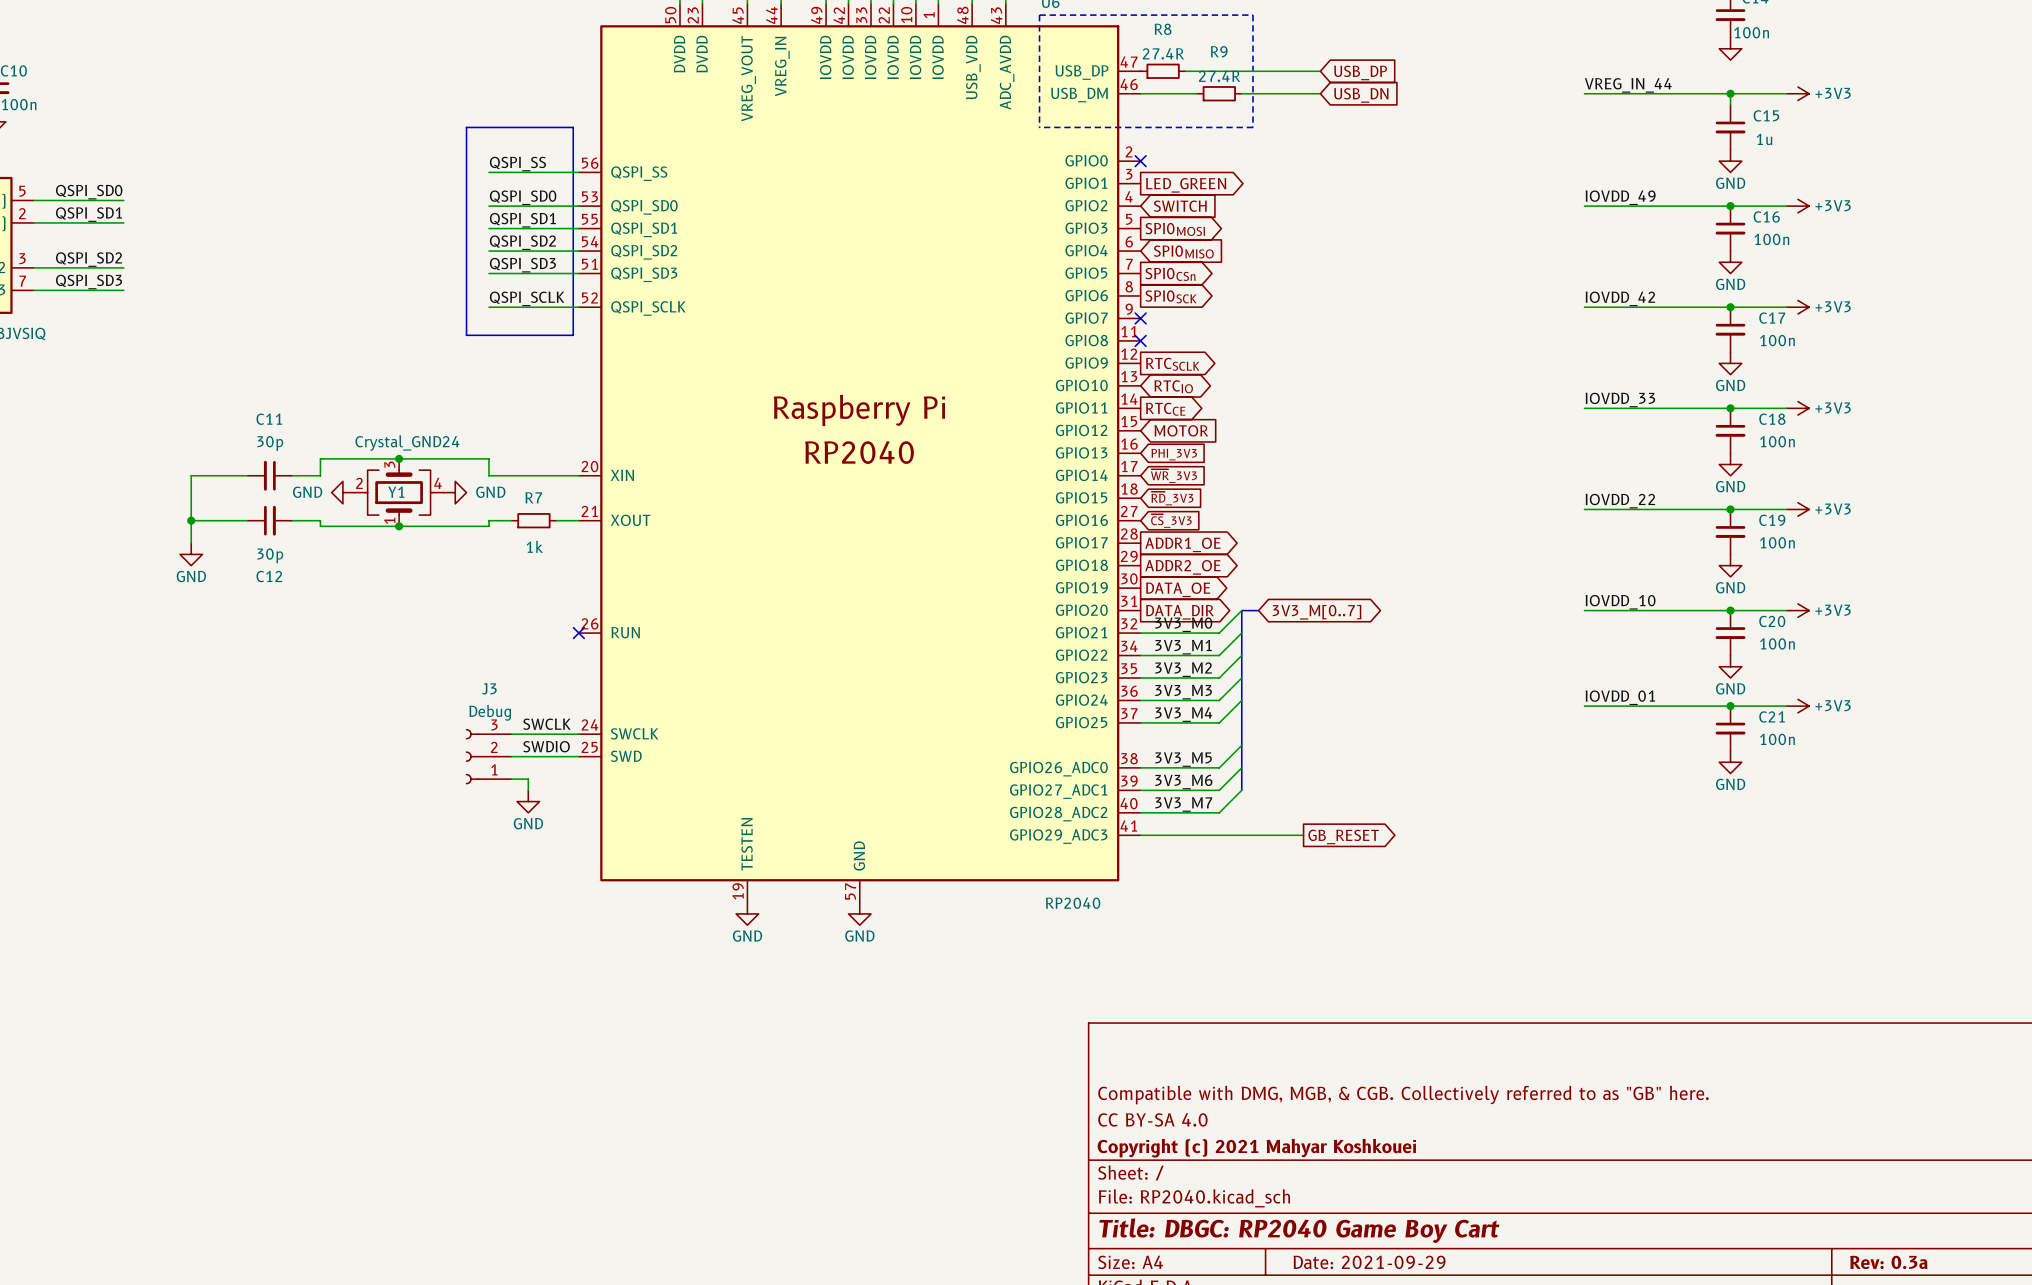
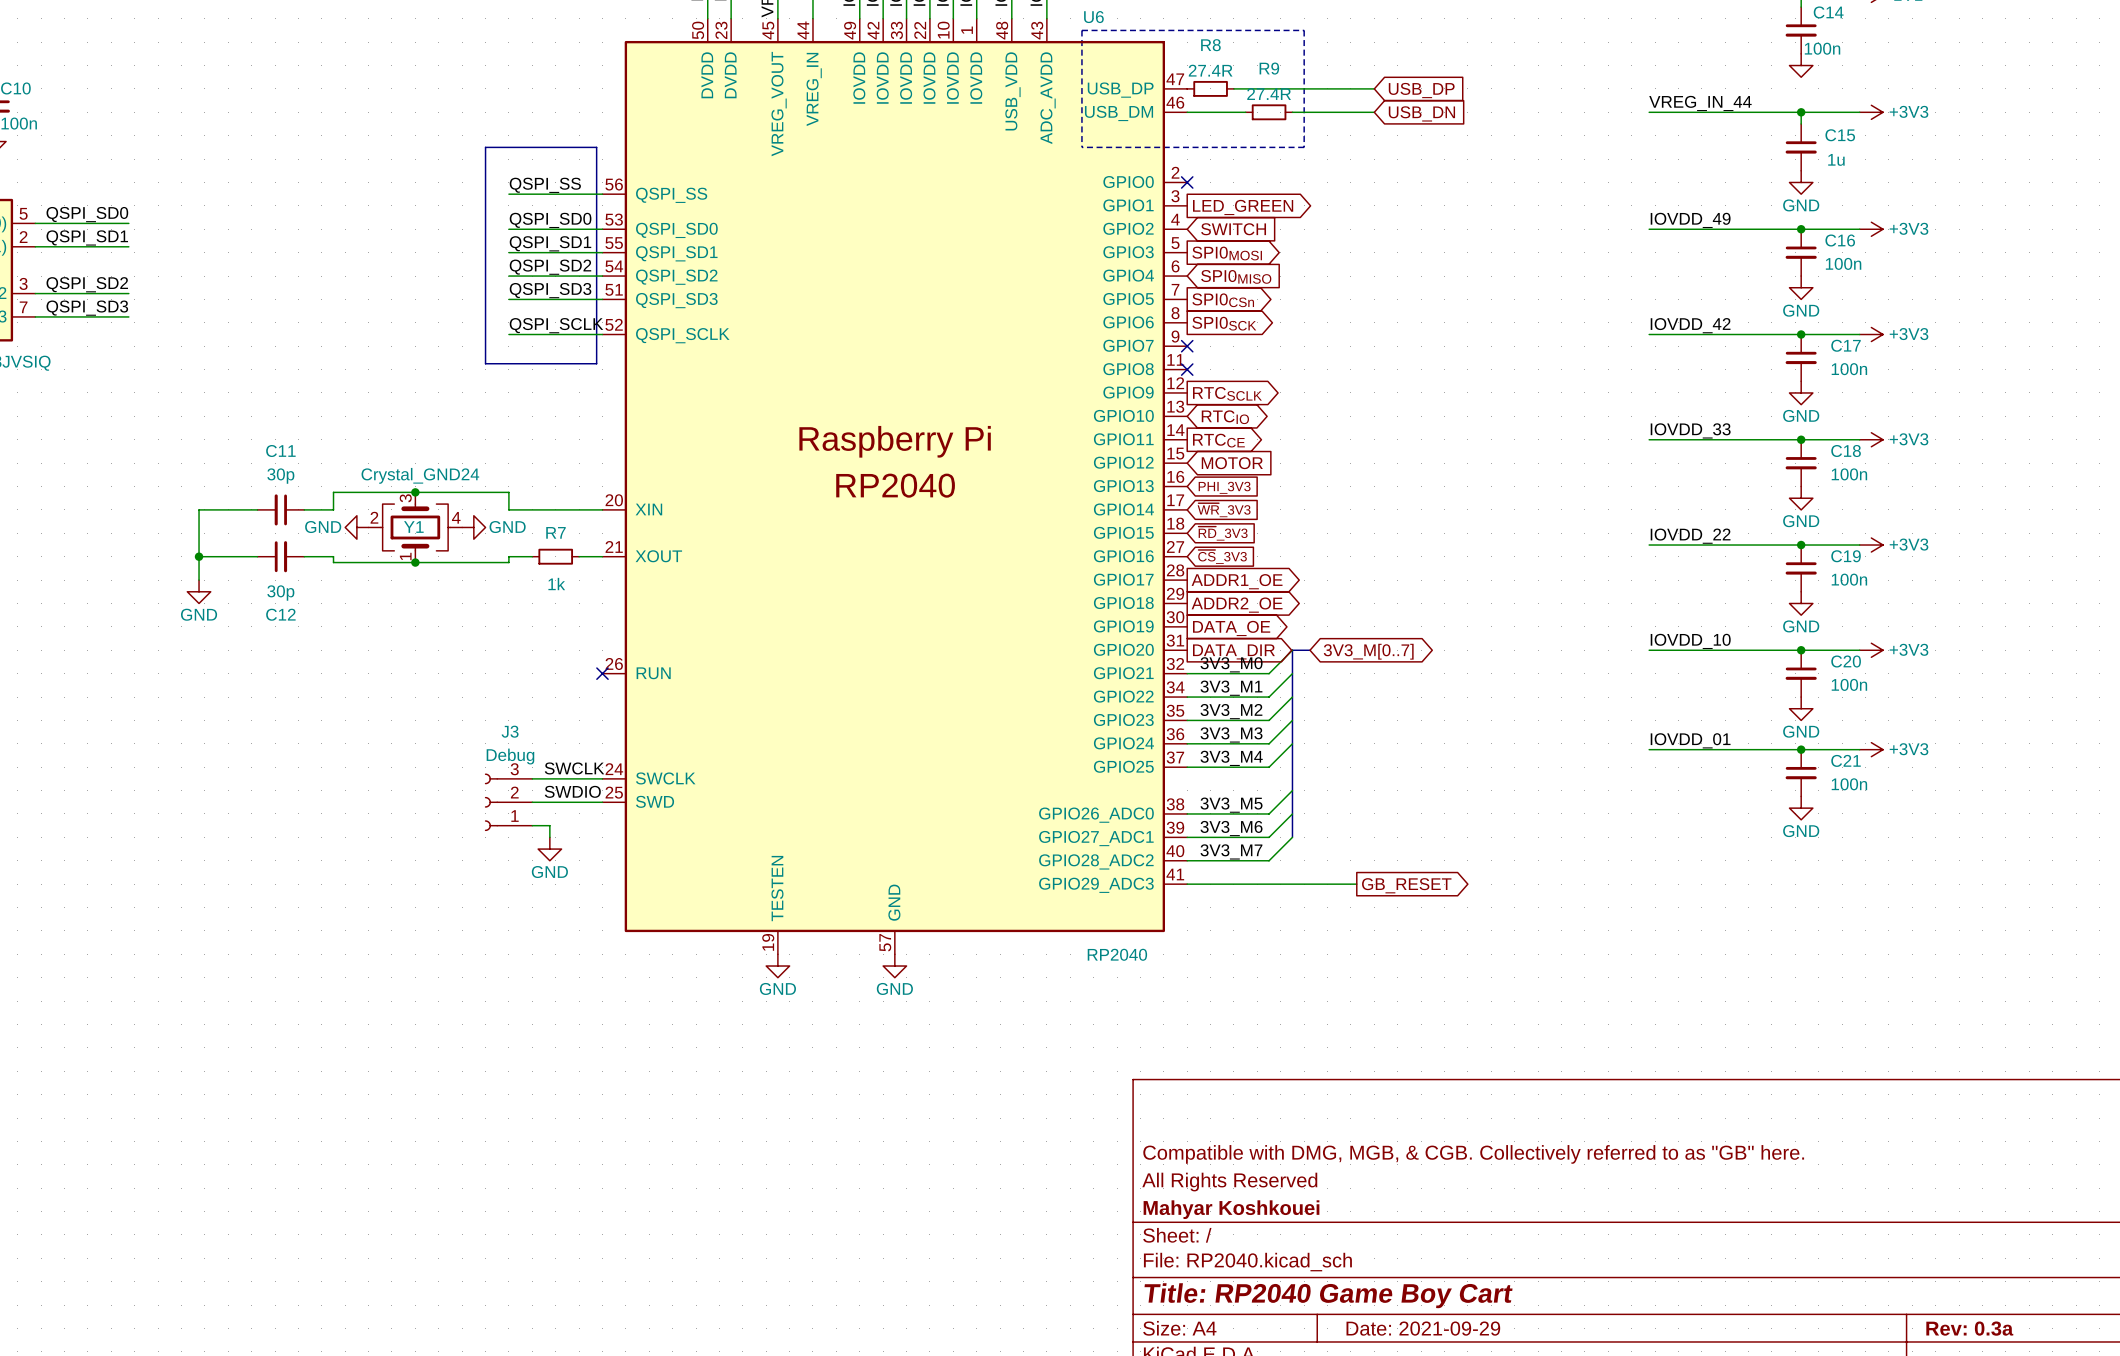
title block: CC BY-SA 4.0 (1152, 1119) -> All Rights Reserved (1229, 1182)
title block: Copyright (c) 2021 Mahyar Koshkouei (1256, 1148) -> Mahyar Koshkouei (1231, 1209)
title block: Title: DBGC: RP2040 Game Boy Cart (1299, 1230) -> Title: RP2040 Game Boy Cart (1328, 1295)

